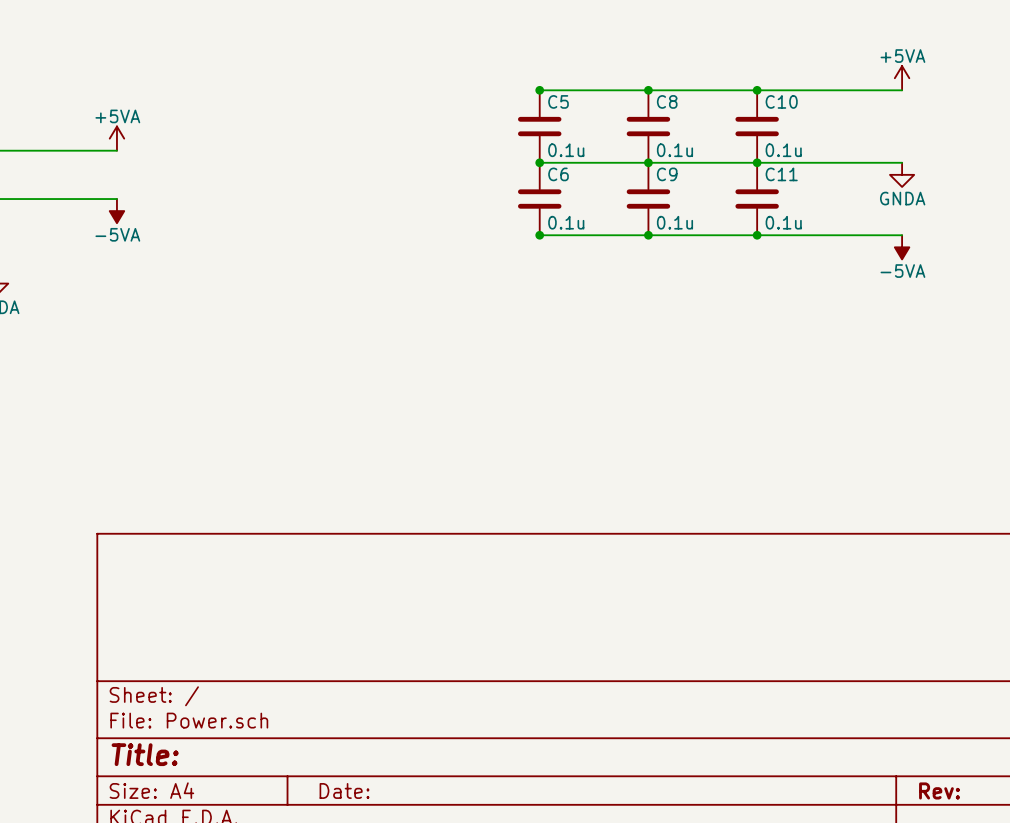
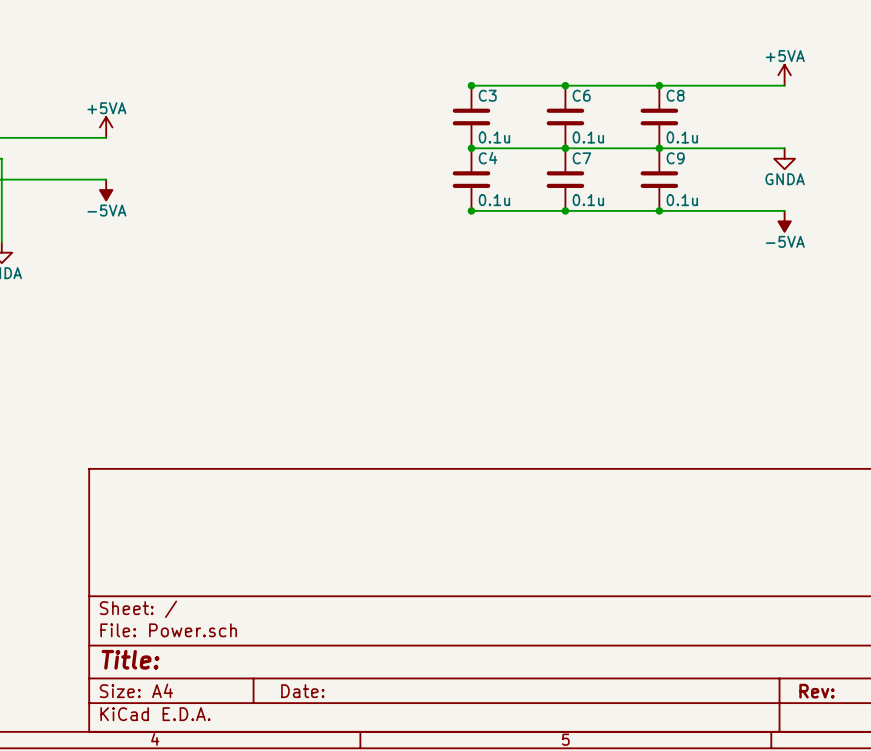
C5 name: C5 (558, 101) -> C3 (487, 95)
C8 name: C8 (667, 101) -> C6 (581, 95)
C10 name: C10 (781, 101) -> C8 (675, 95)
C6 name: C6 (558, 174) -> C4 (487, 158)
C9 name: C9 (667, 174) -> C7 (581, 158)
C11 name: C11 (781, 174) -> C9 (675, 158)

